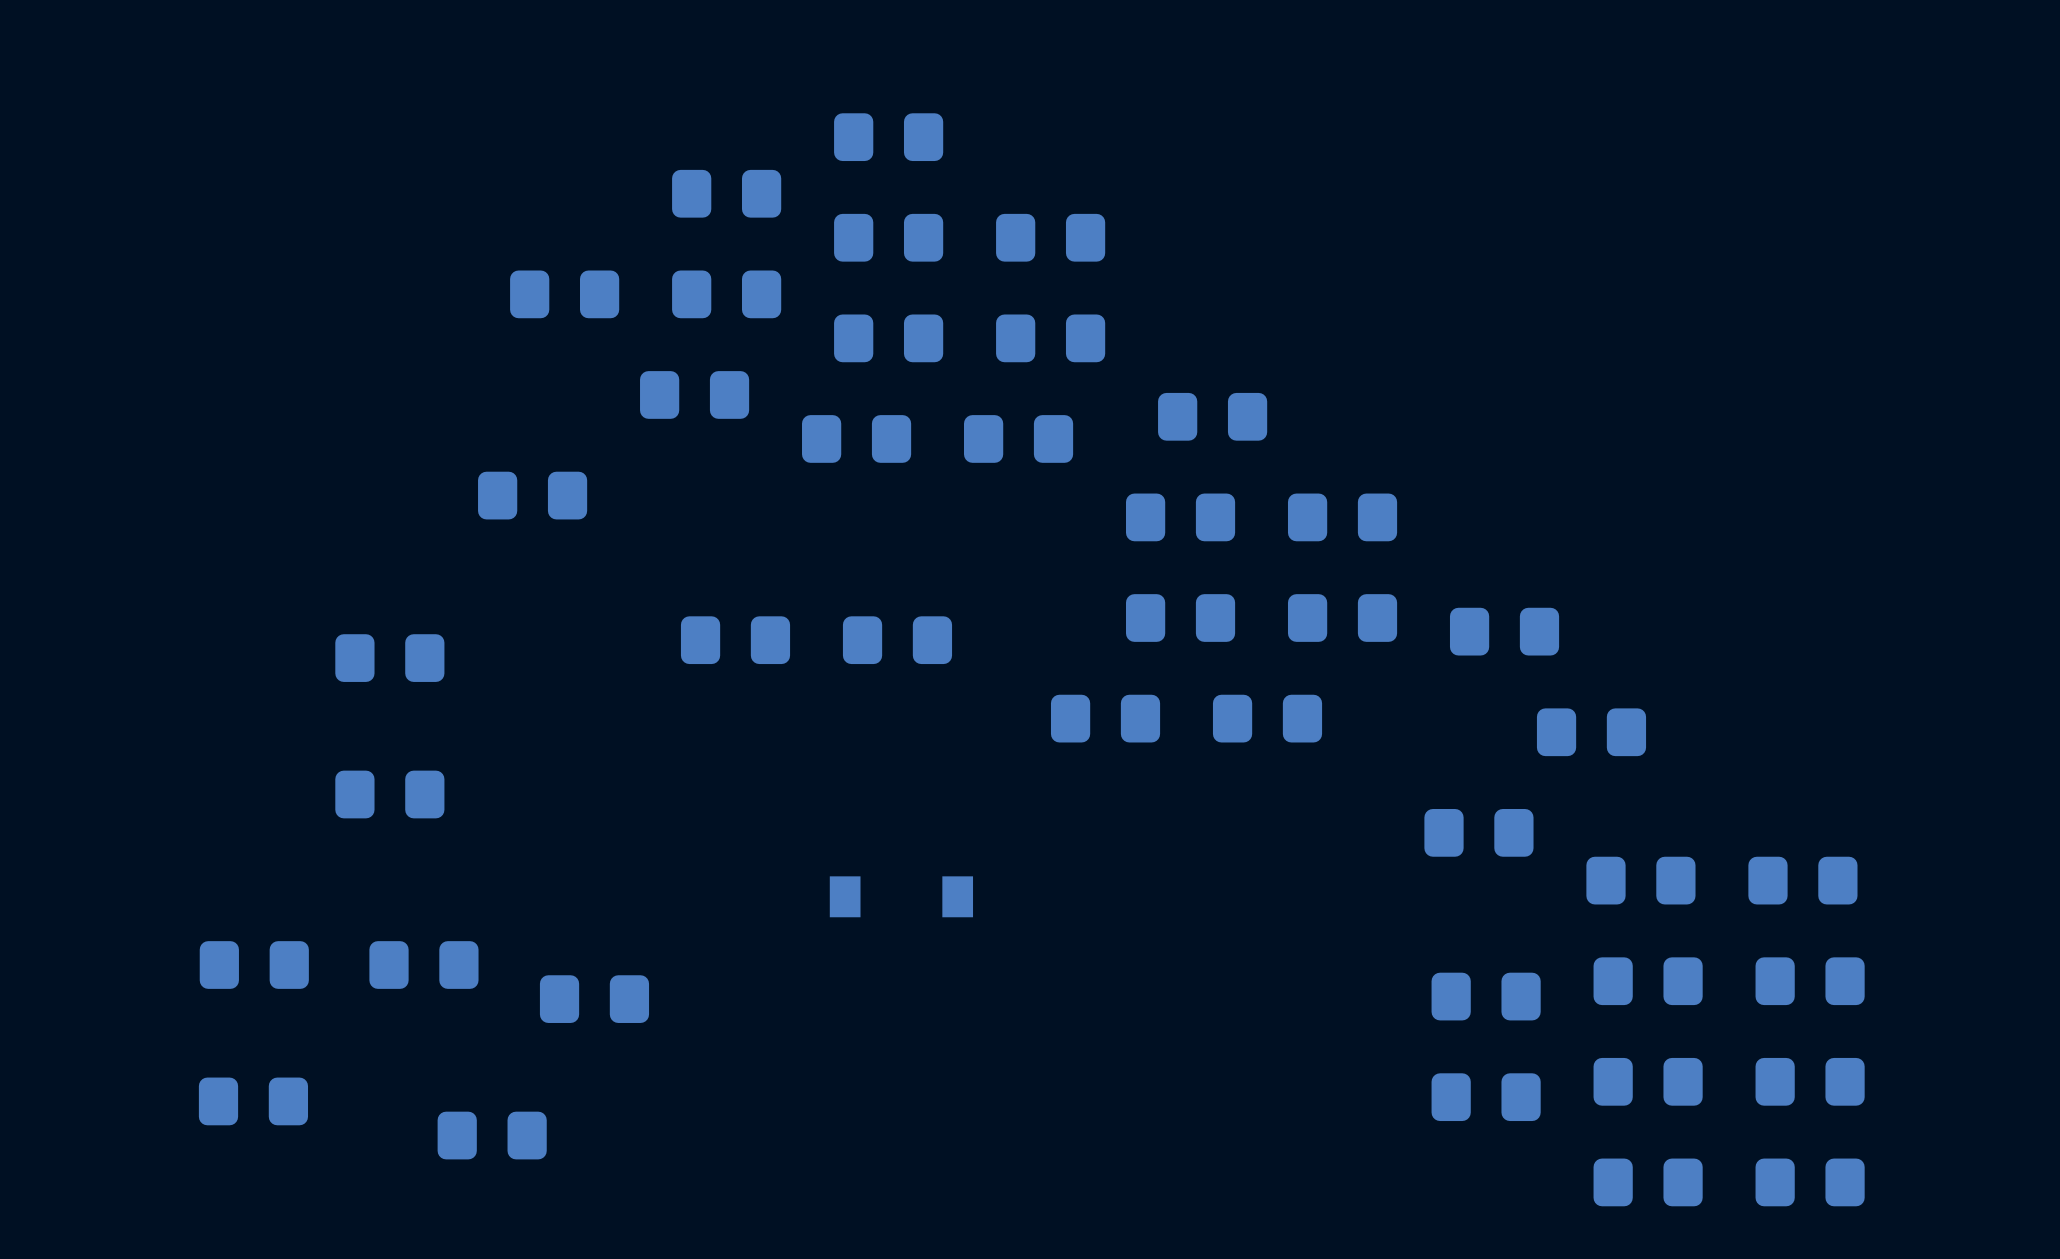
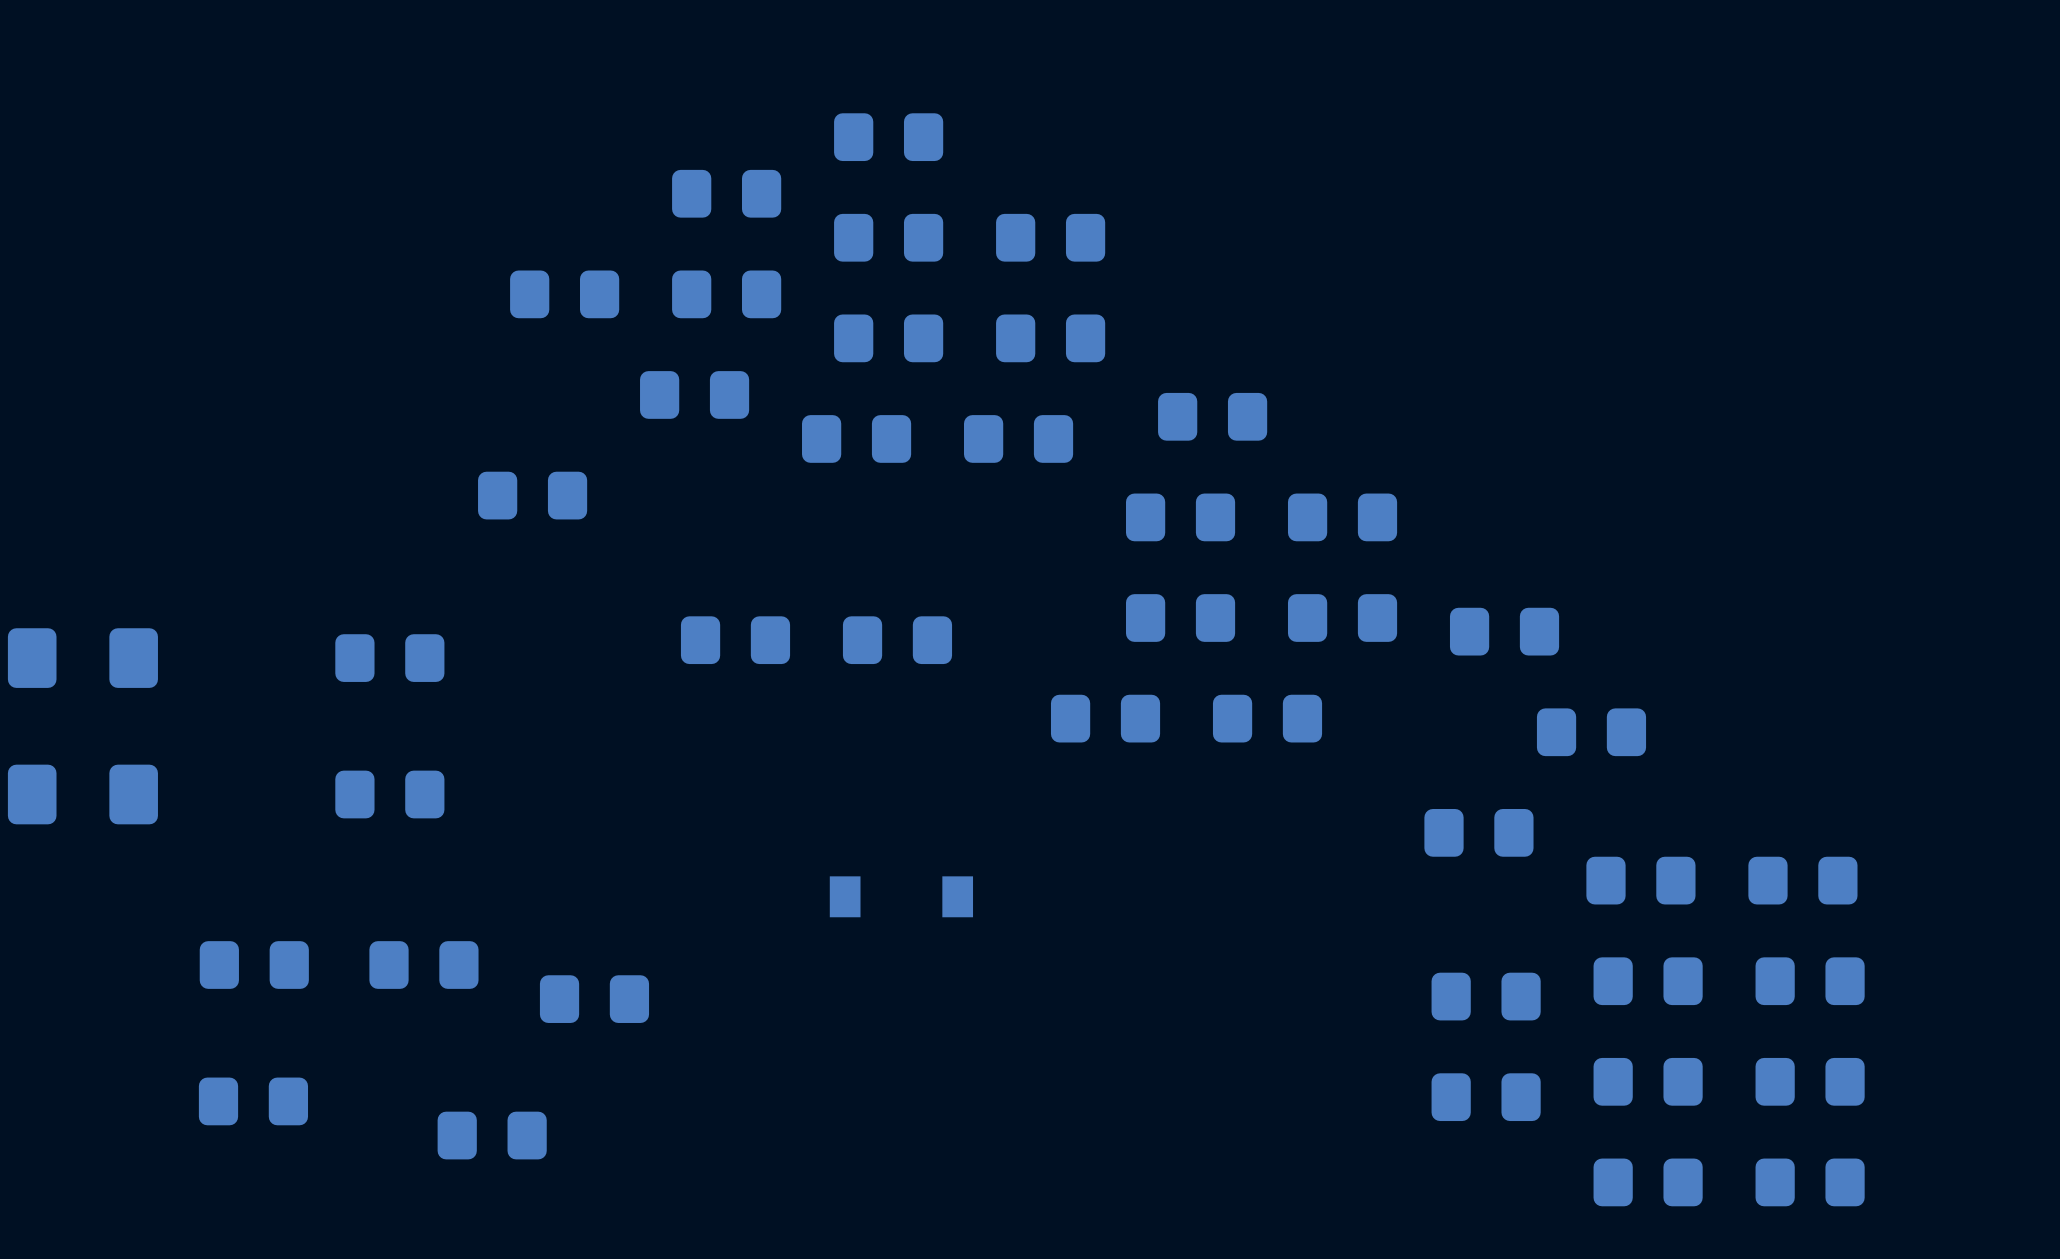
part: none -> (82, 658)
part: none -> (82, 794)

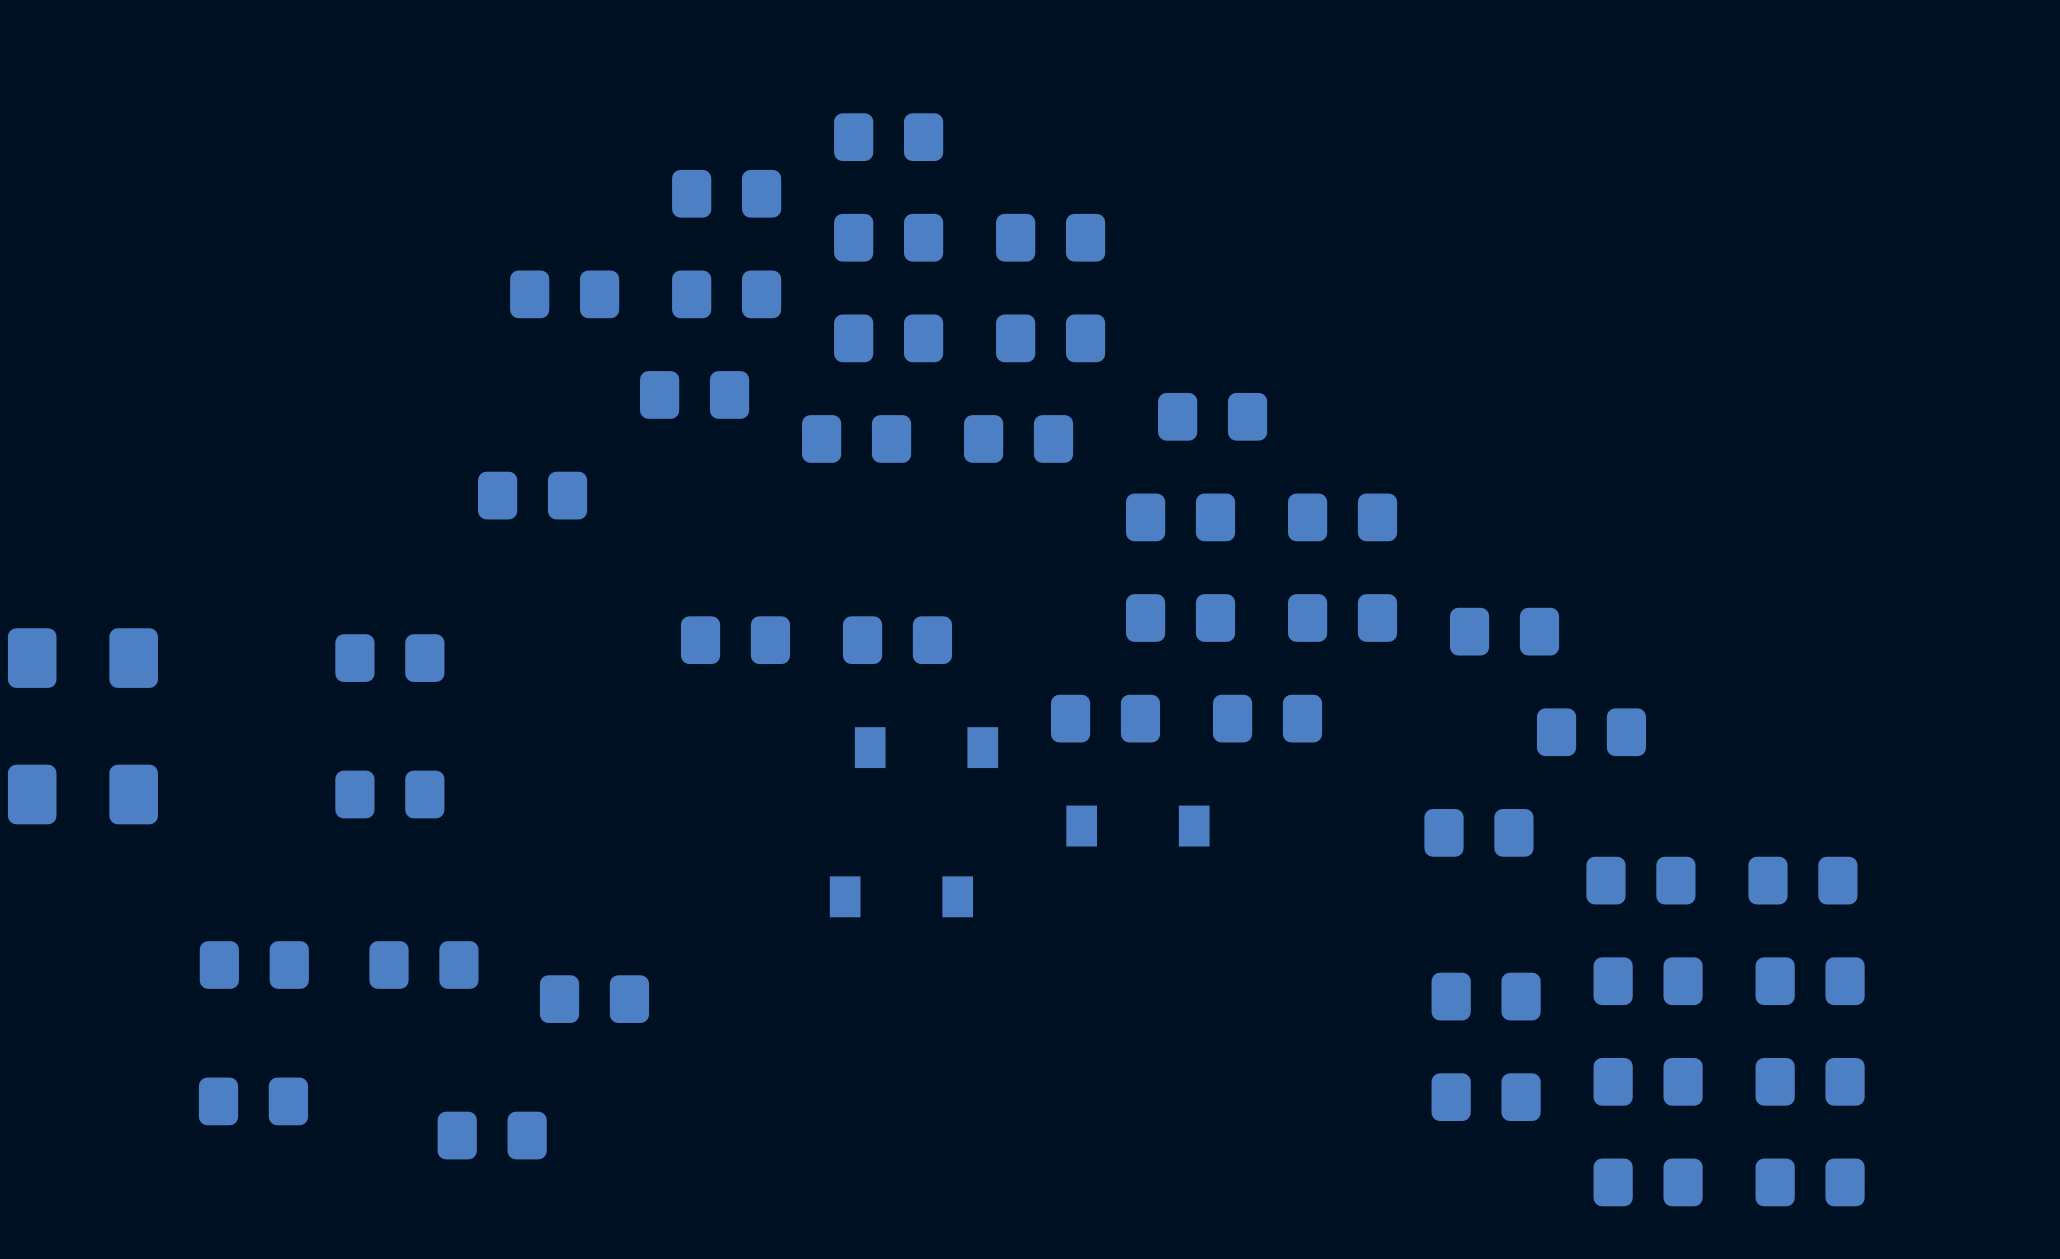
part: none -> (926, 747)
part: none -> (1137, 826)

